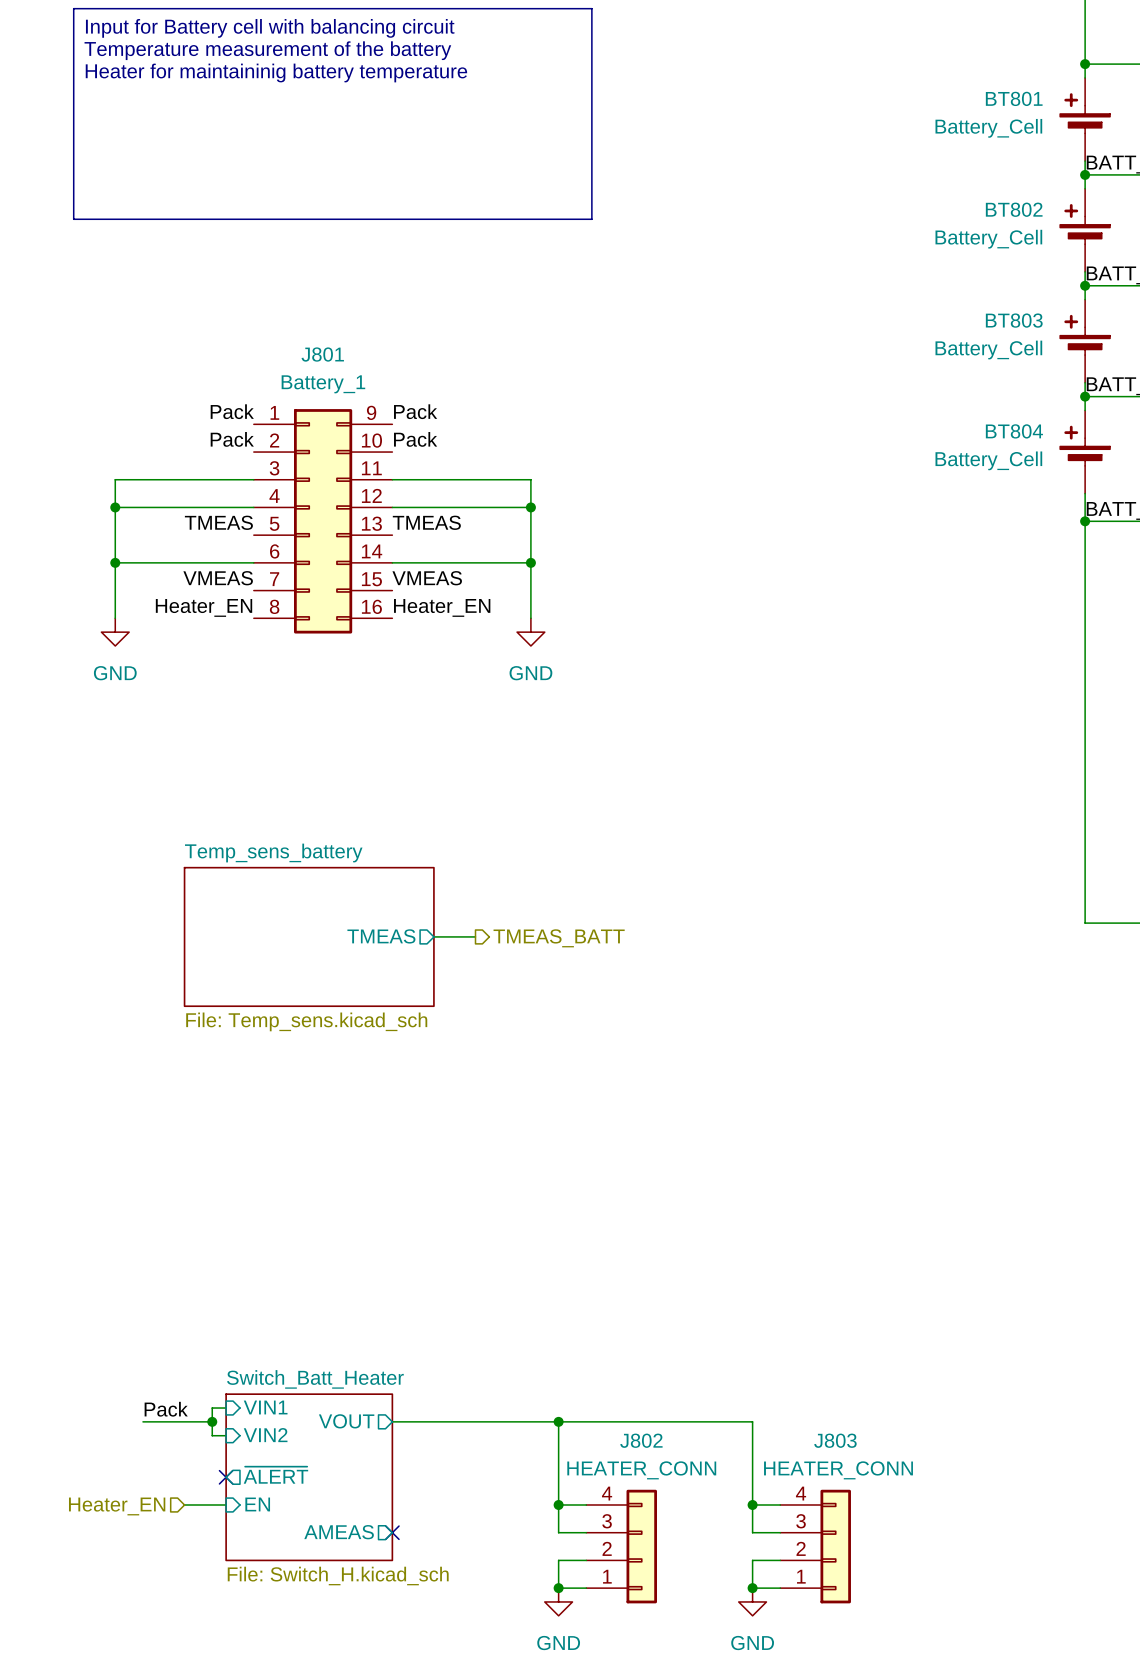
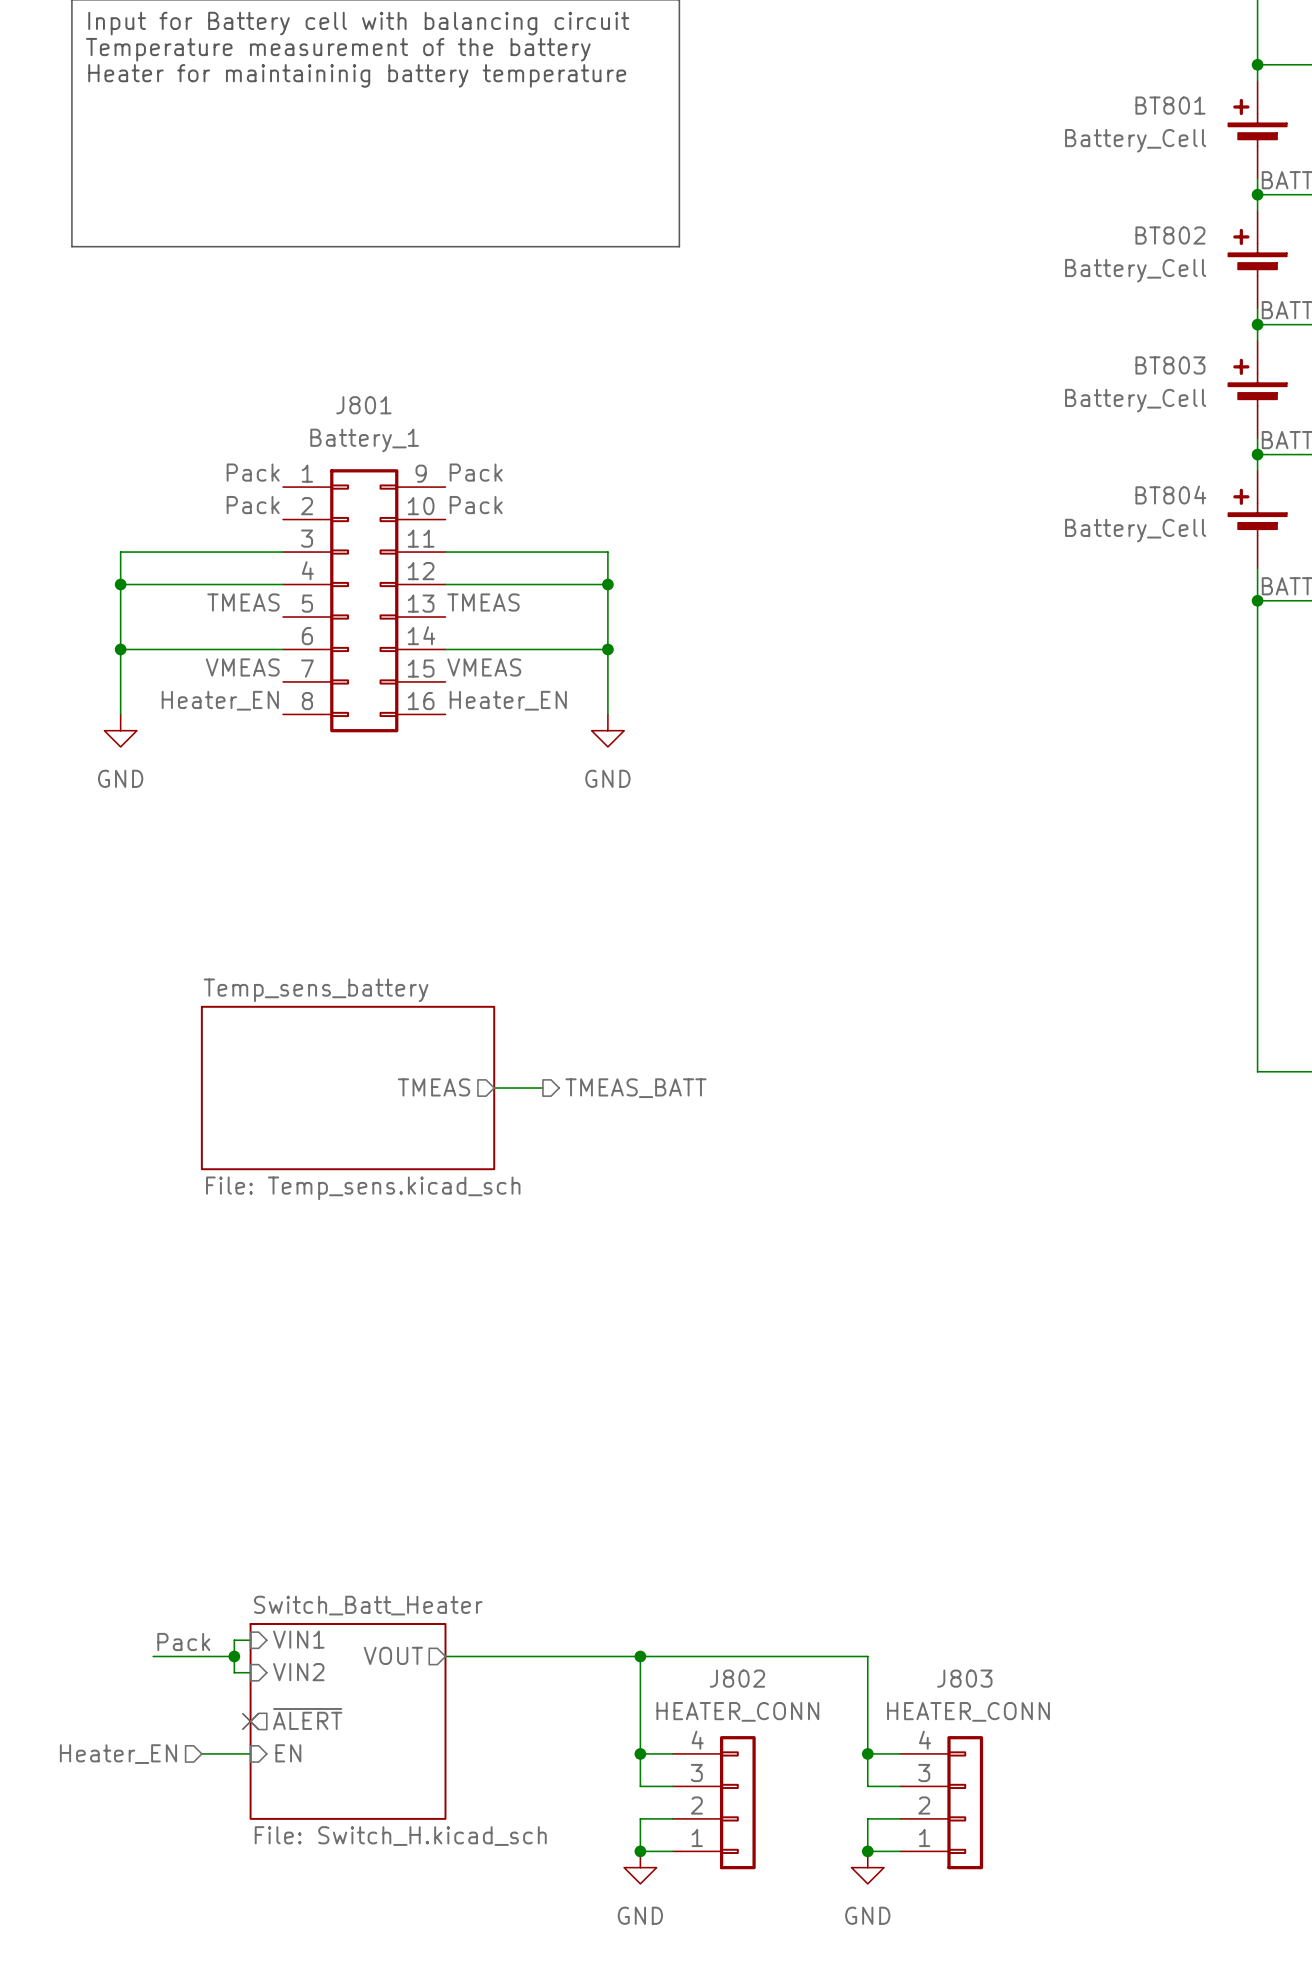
sheet pin: AMEAS (339, 1532) -> none
no-connect mark: (392, 1532) -> none

